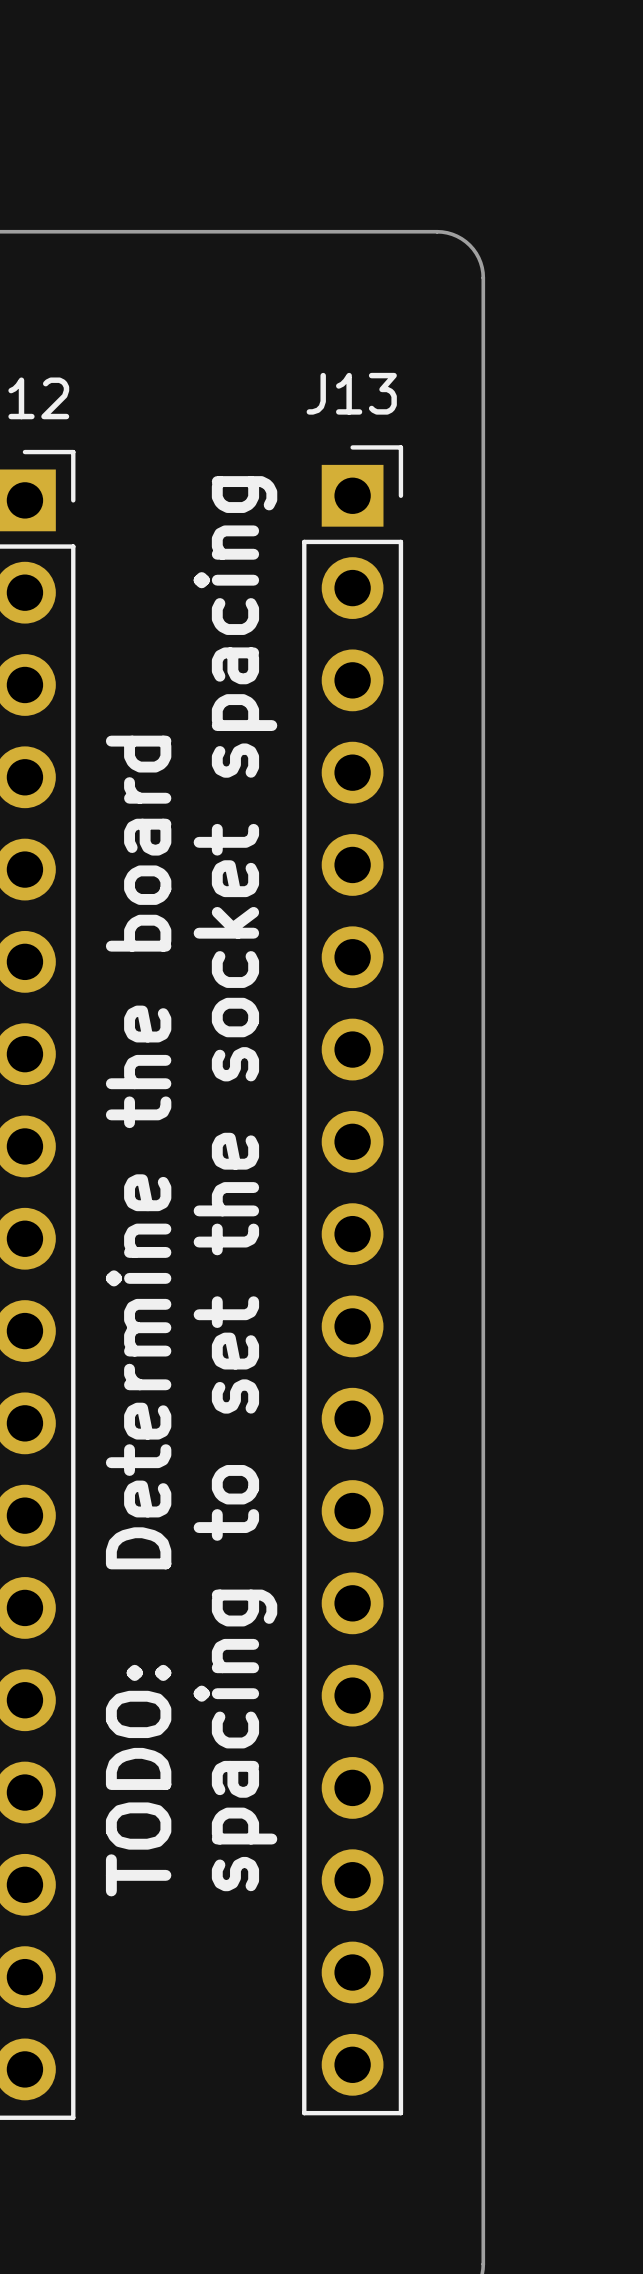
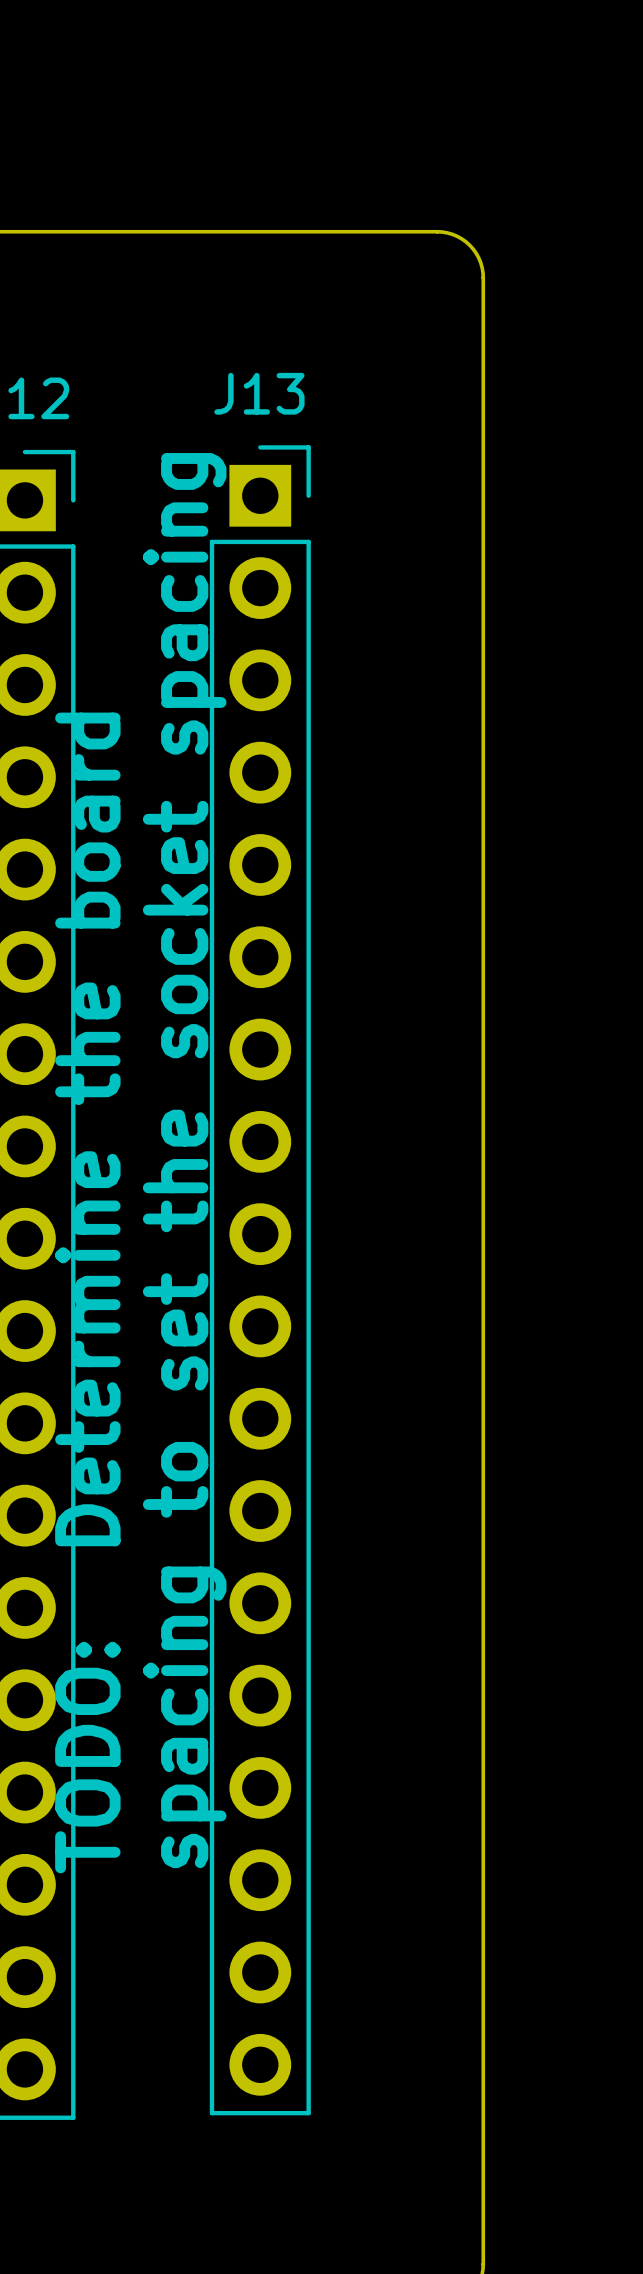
text position: spacing to set the socket spacing (235, 1183) -> spacing to set the socket spacing (184, 1160)
J13 position: (352, 1280) -> (260, 1280)
text position: TODO: Determine the board (138, 1316) -> TODO: Determine the board (87, 1292)

